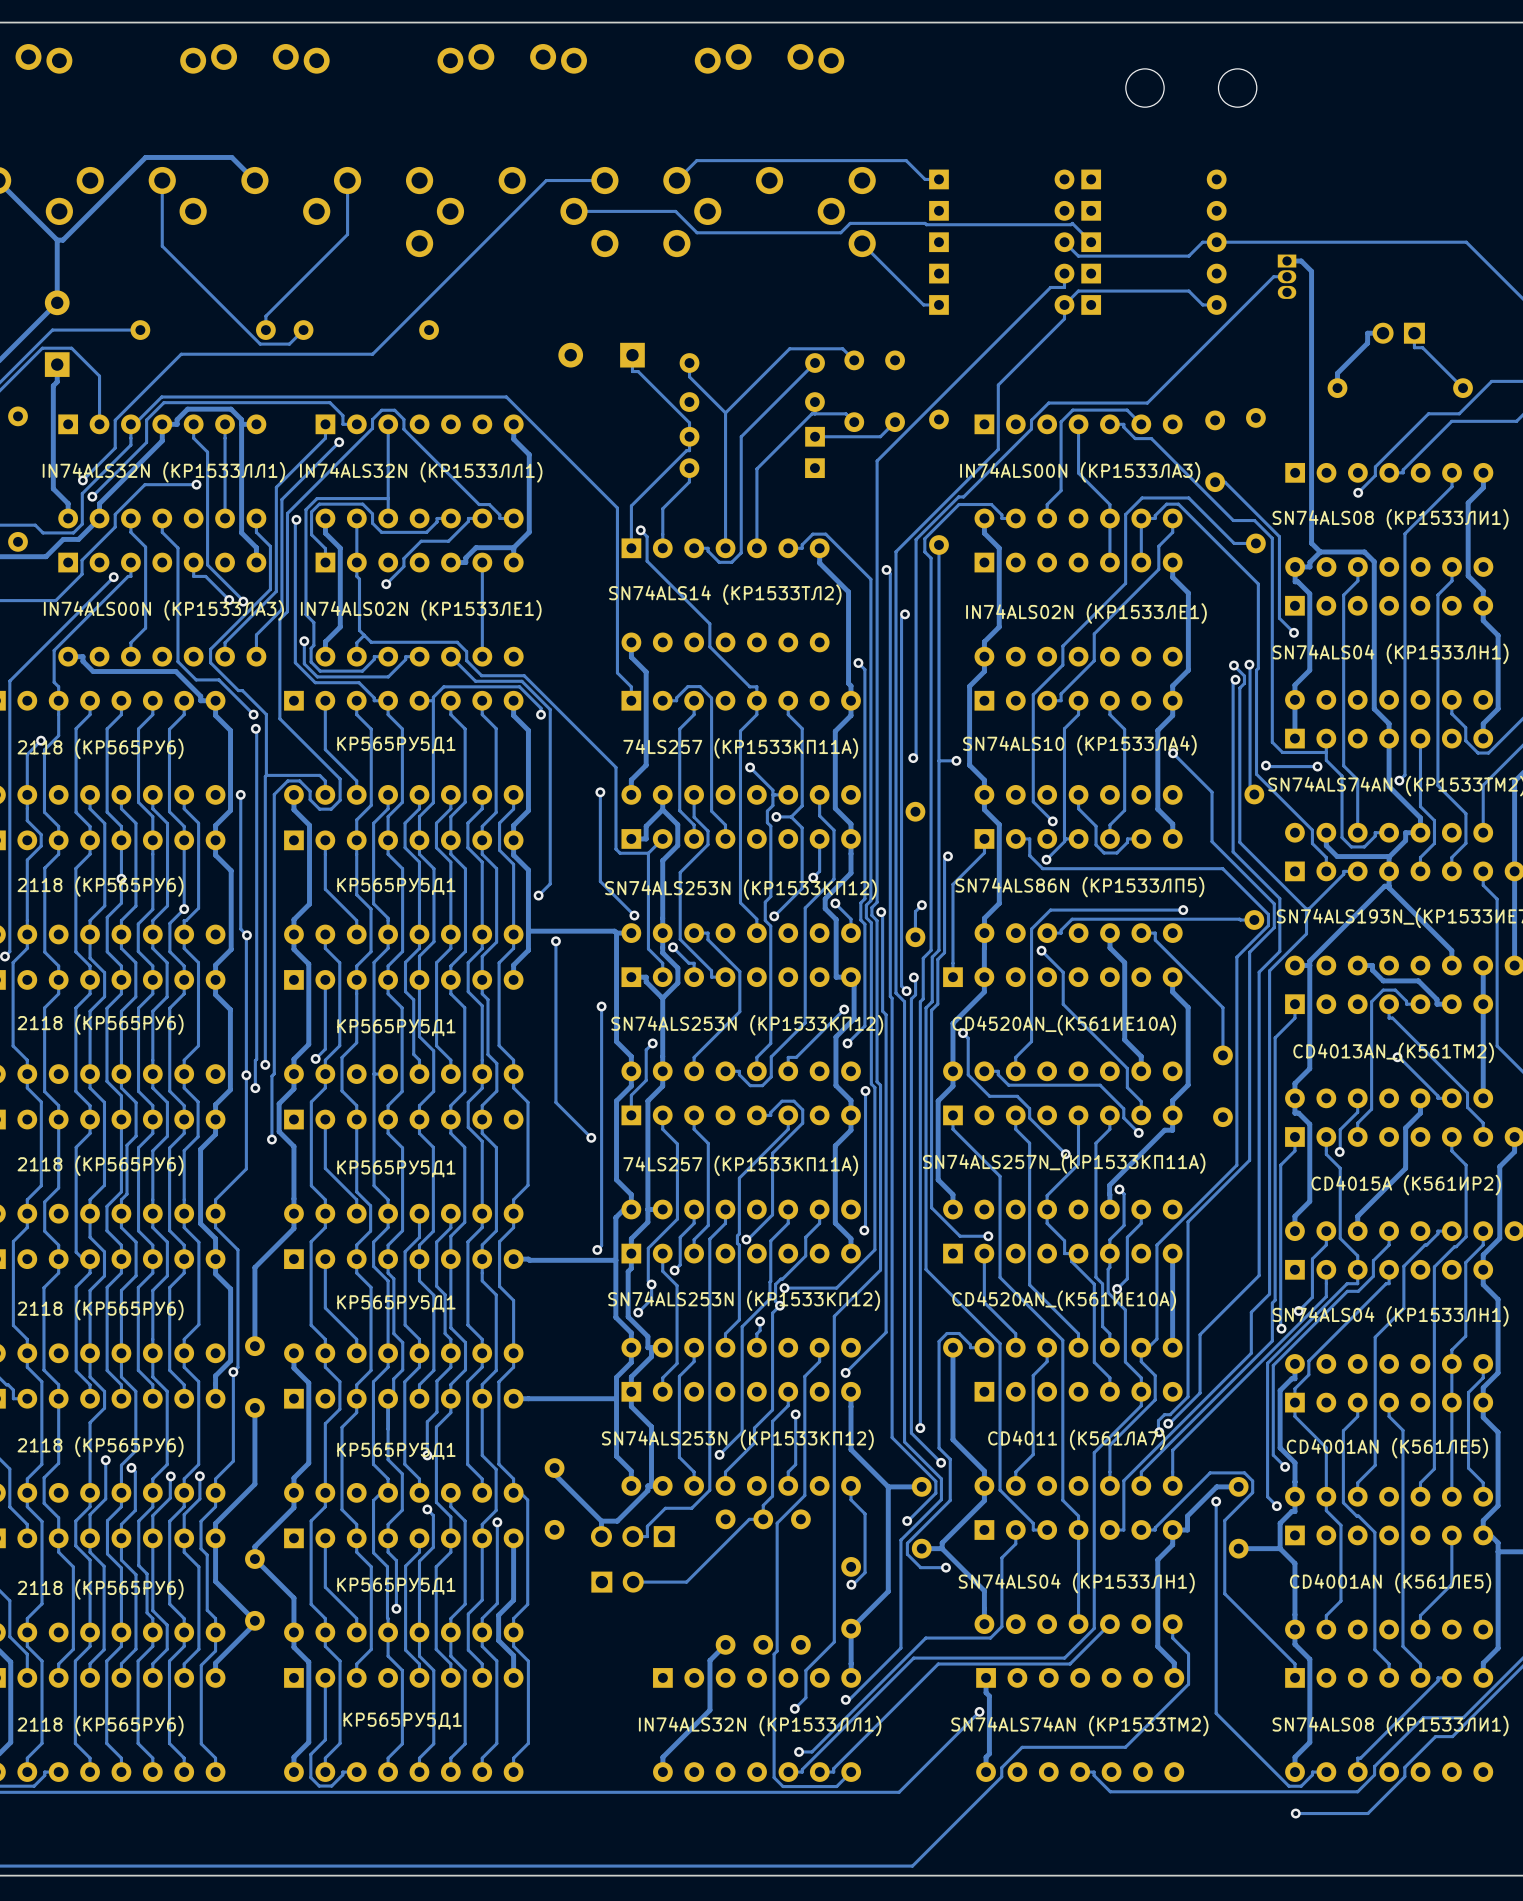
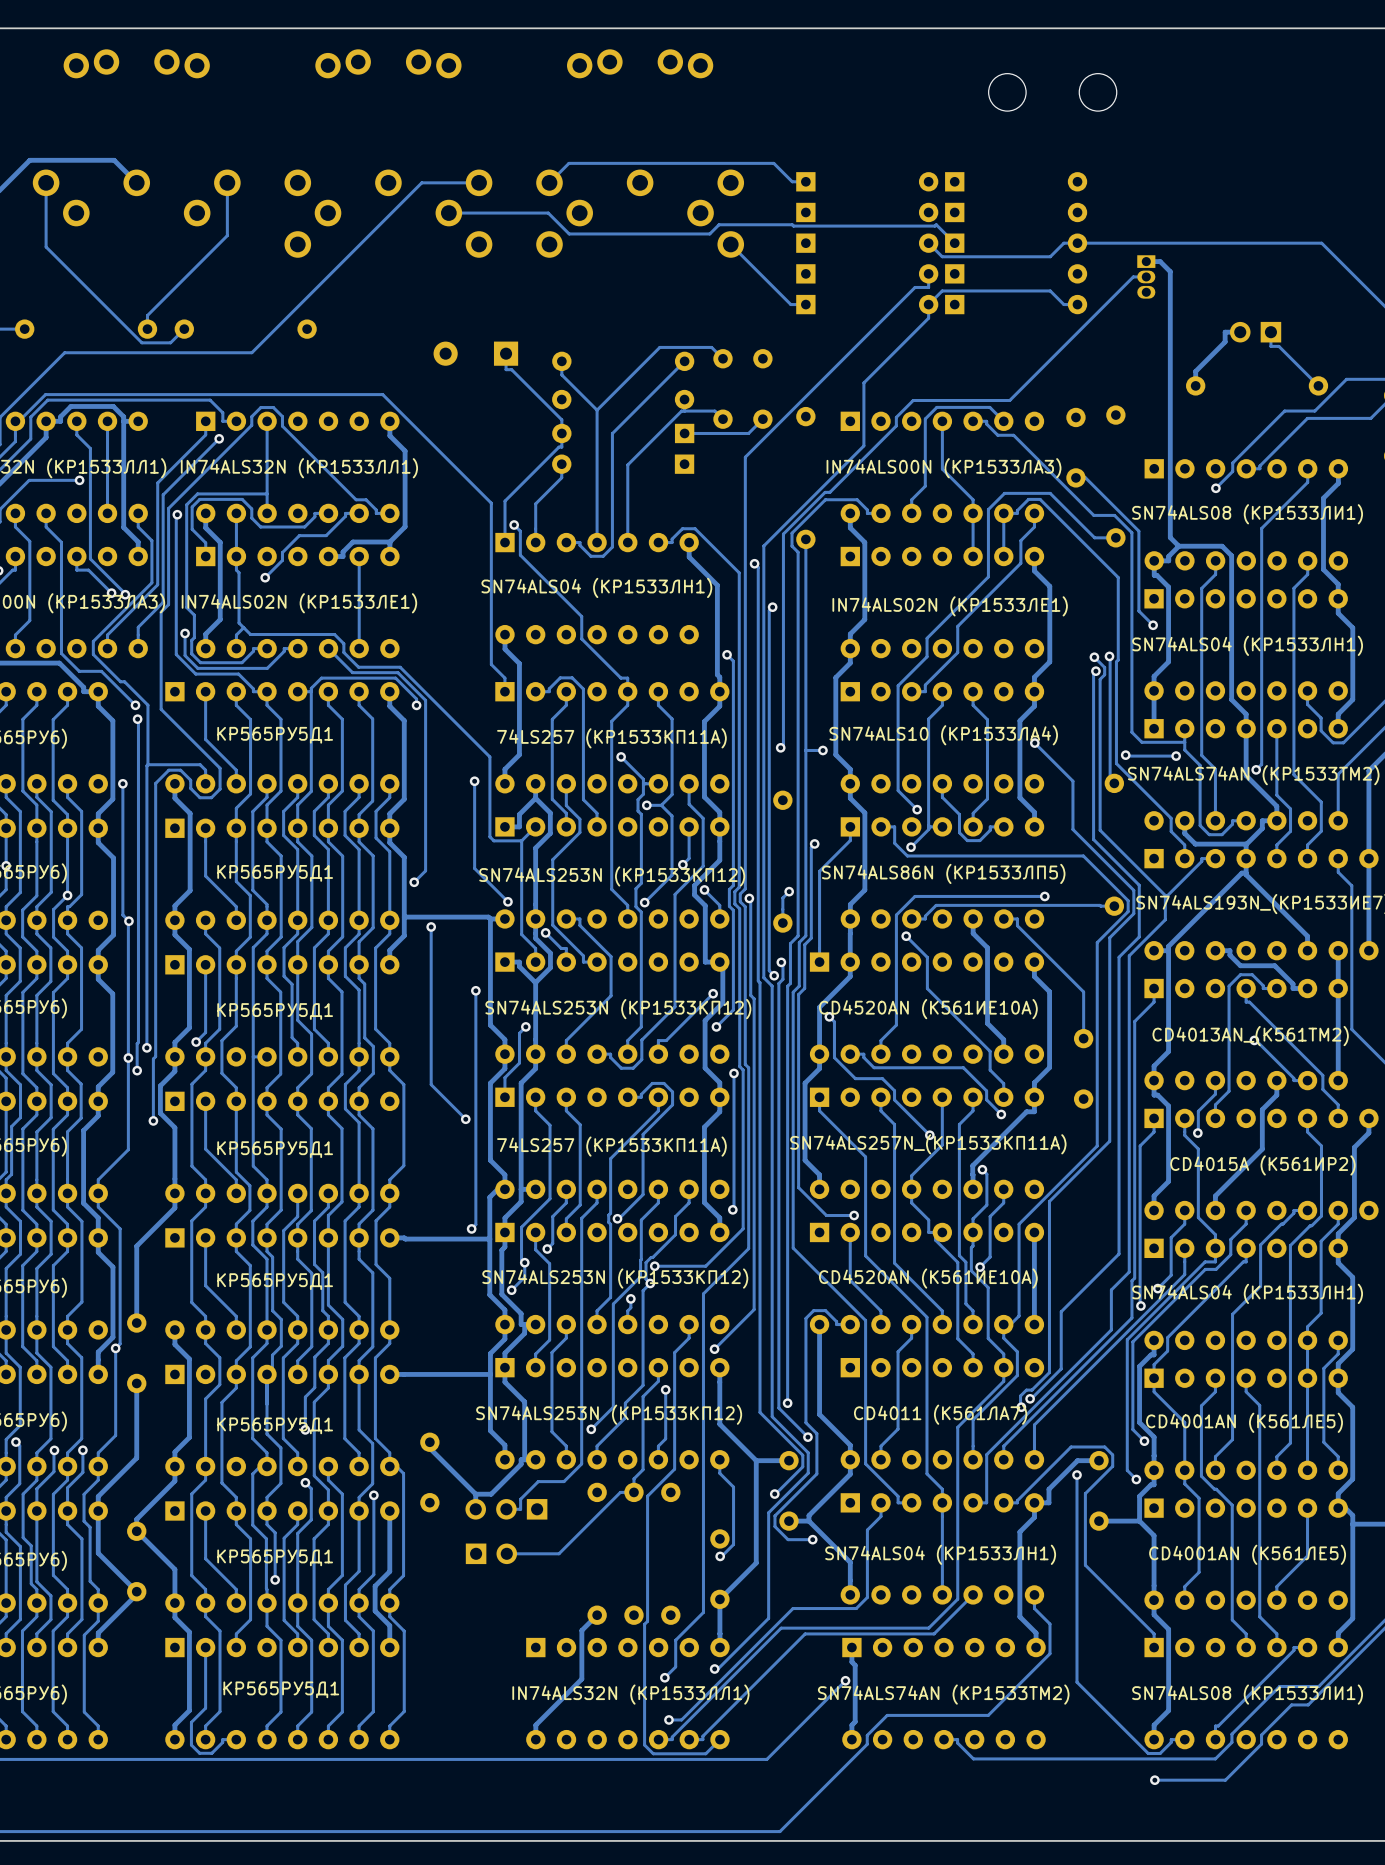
part value: SN74ALS14 (КР1533ТЛ2) (725, 594) -> SN74ALS04 (КР1533ЛН1) (596, 587)
part value: CD4520АN_(К561ИЕ10A) (1064, 1025) -> CD4520АN (К561ИЕ10A) (928, 1009)
part value: CD4520АN_(К561ИЕ10A) (1064, 1300) -> CD4520АN (К561ИЕ10A) (928, 1278)

